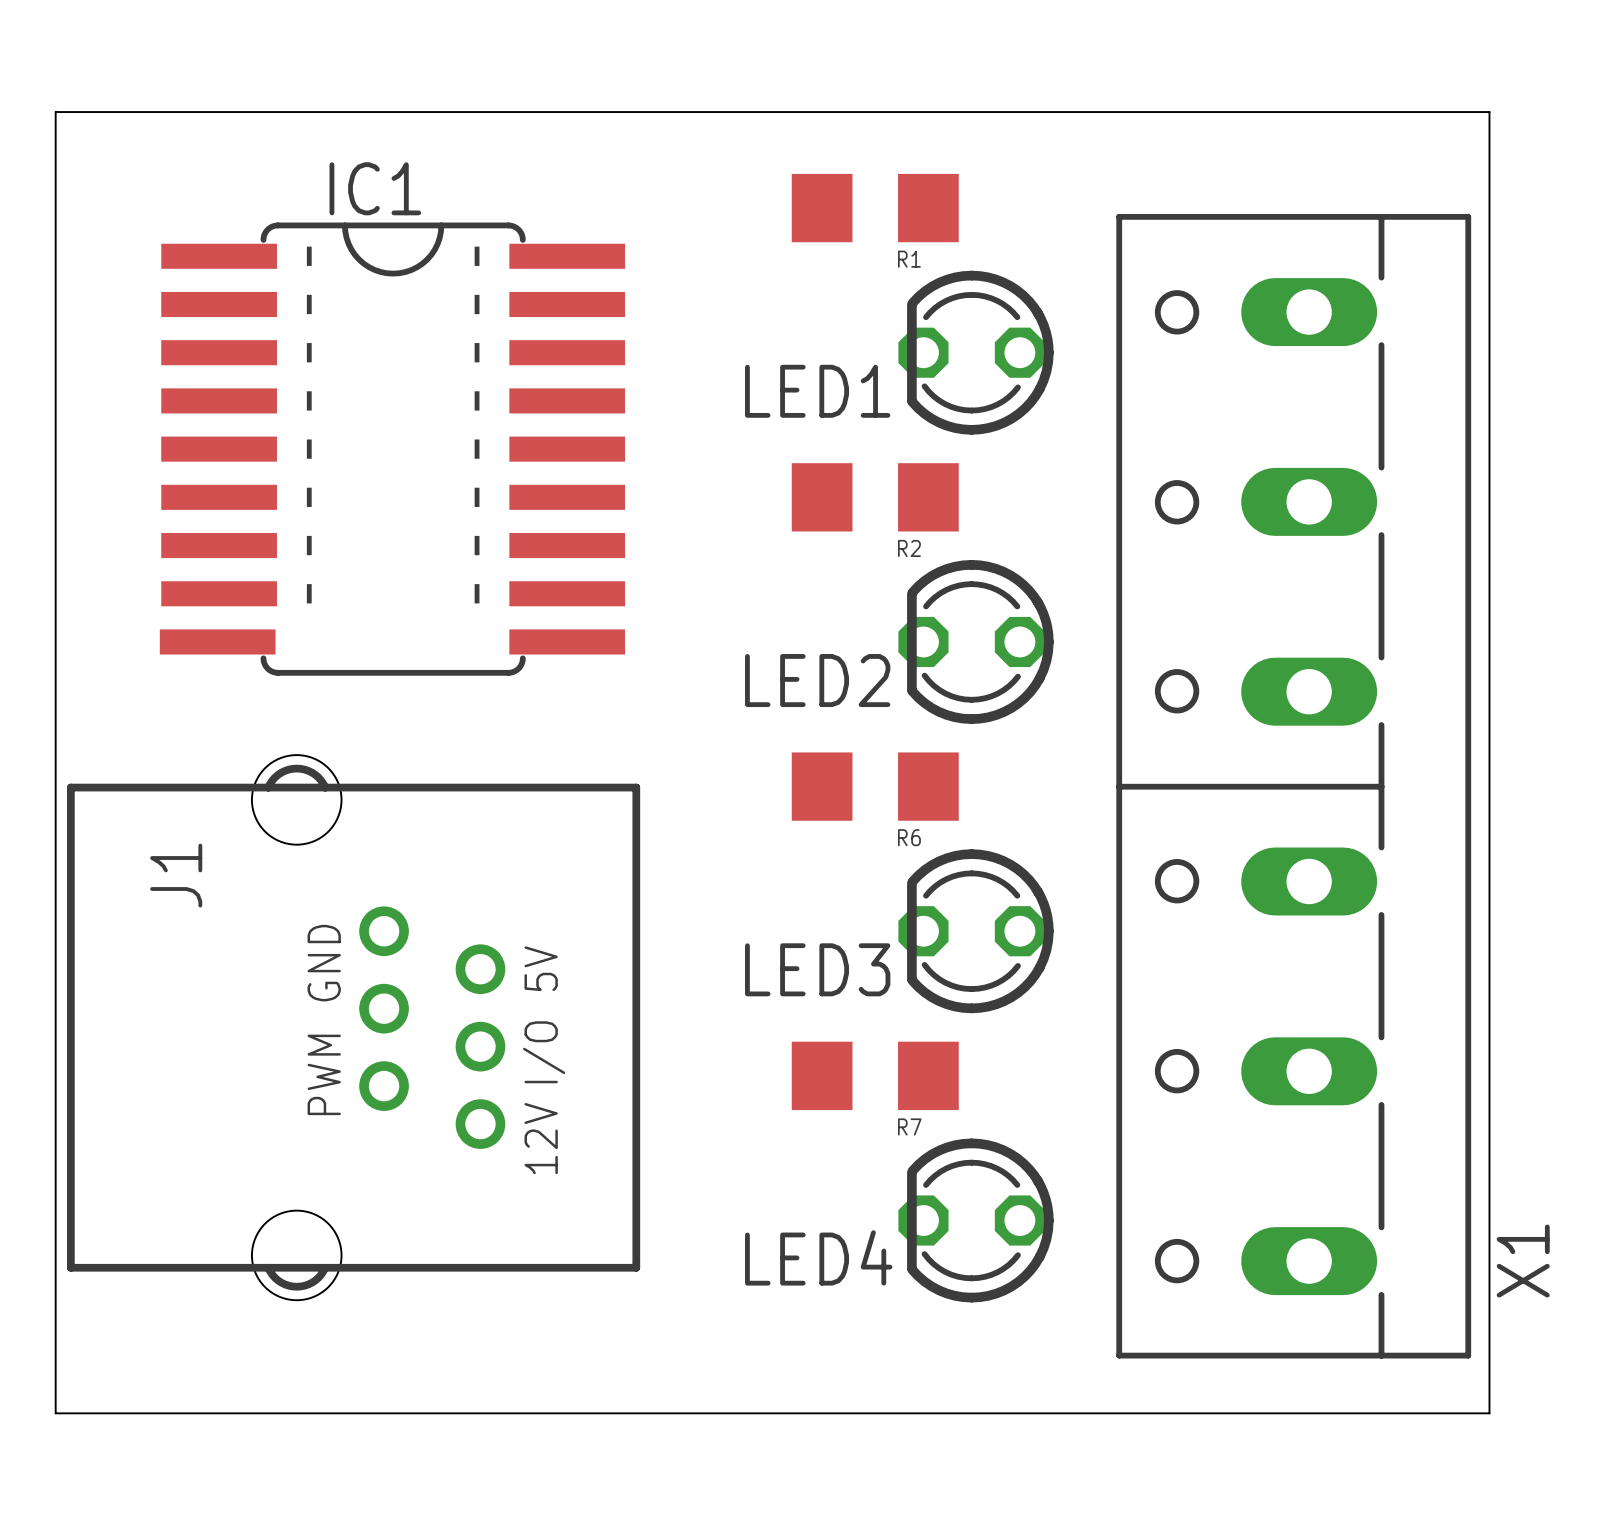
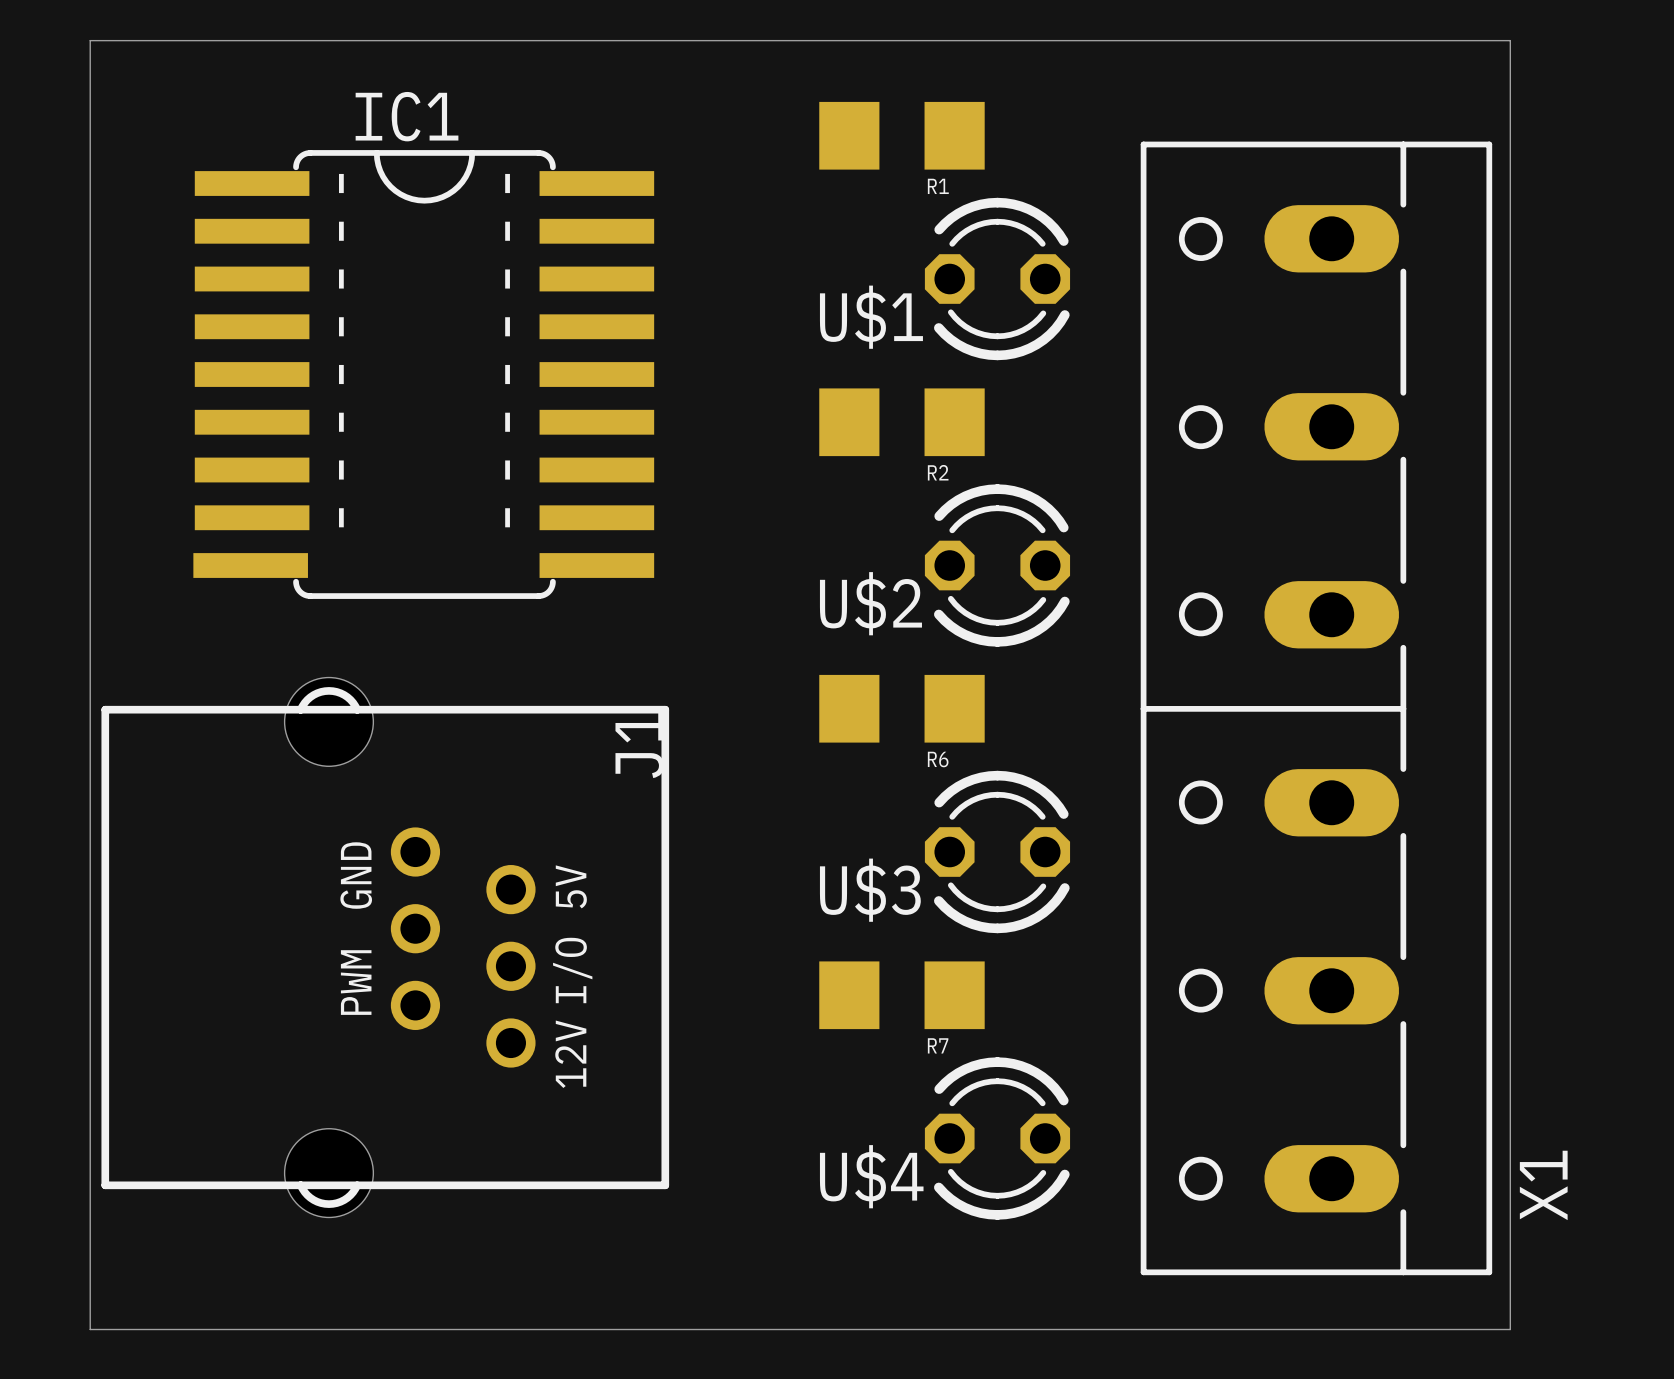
U$1: none -> (997, 279)
LED1: (976, 352) -> none
U$2: none -> (997, 565)
LED2: (976, 641) -> none
J1 name position: J1 (176, 875) -> J1 (639, 744)
U$3: none -> (997, 852)
LED3: (976, 931) -> none
U$4: none -> (997, 1138)
LED4: (976, 1220) -> none

